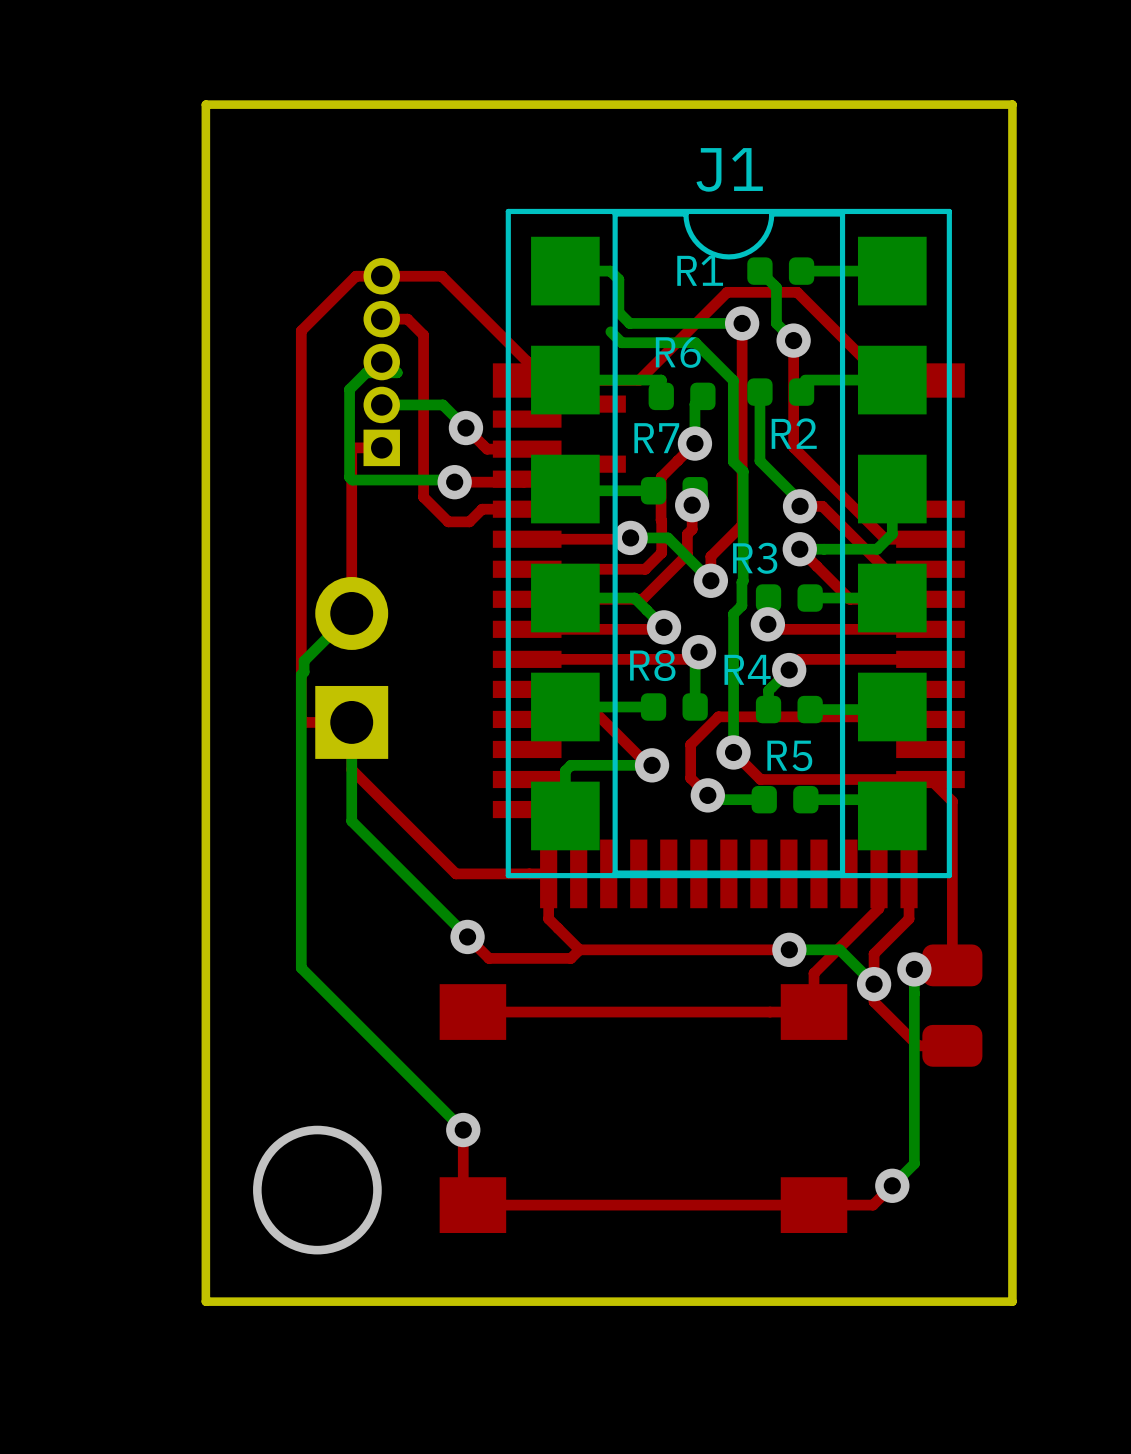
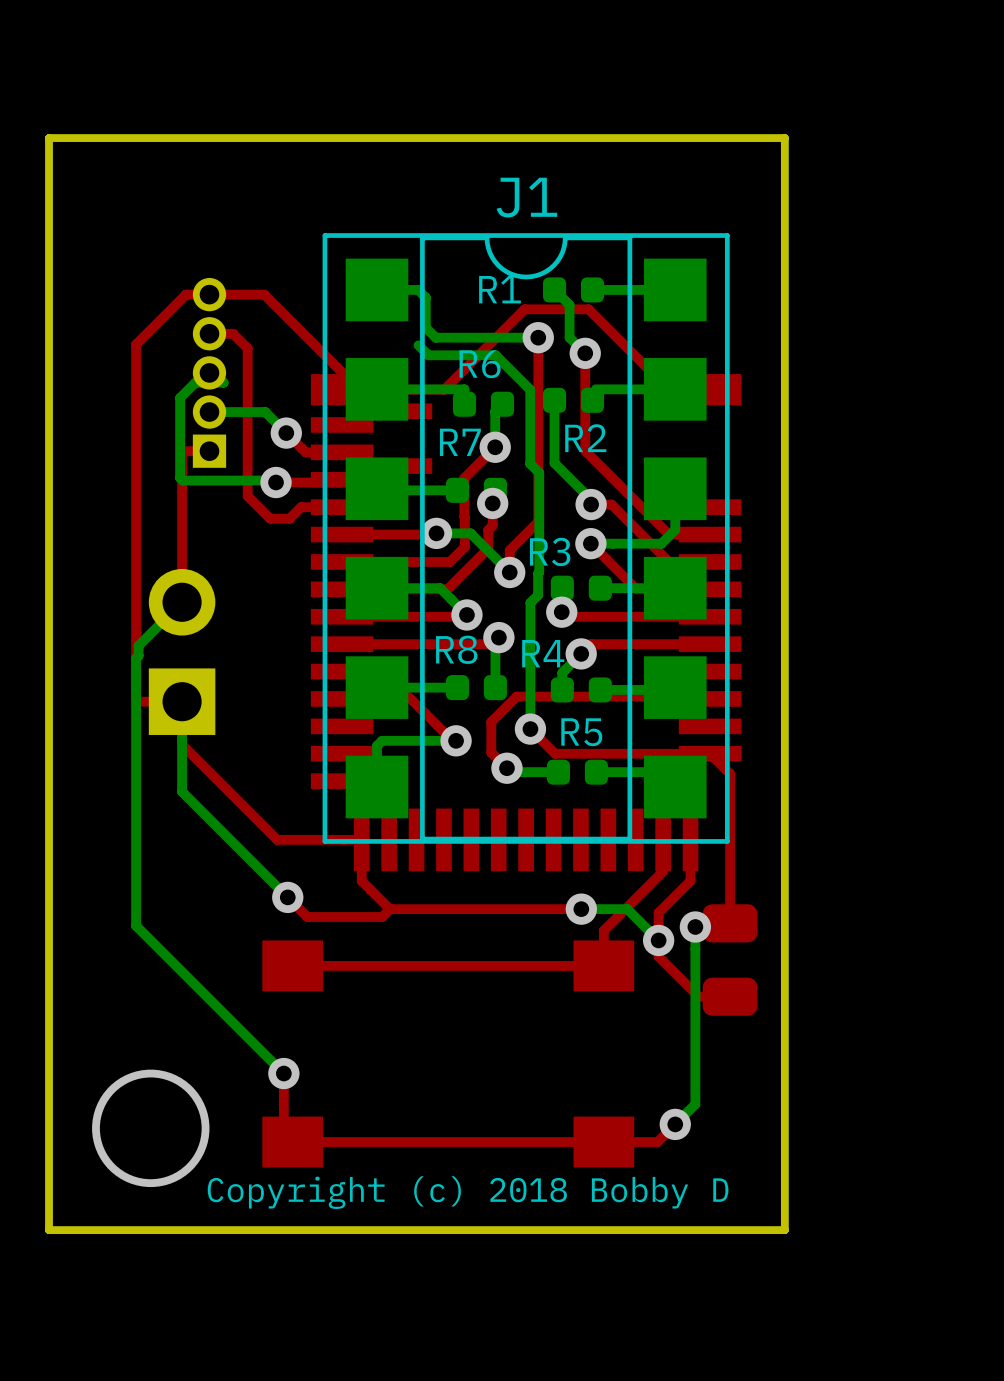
text: none -> Copyright (c) 2018 Bobby D (468, 1192)

